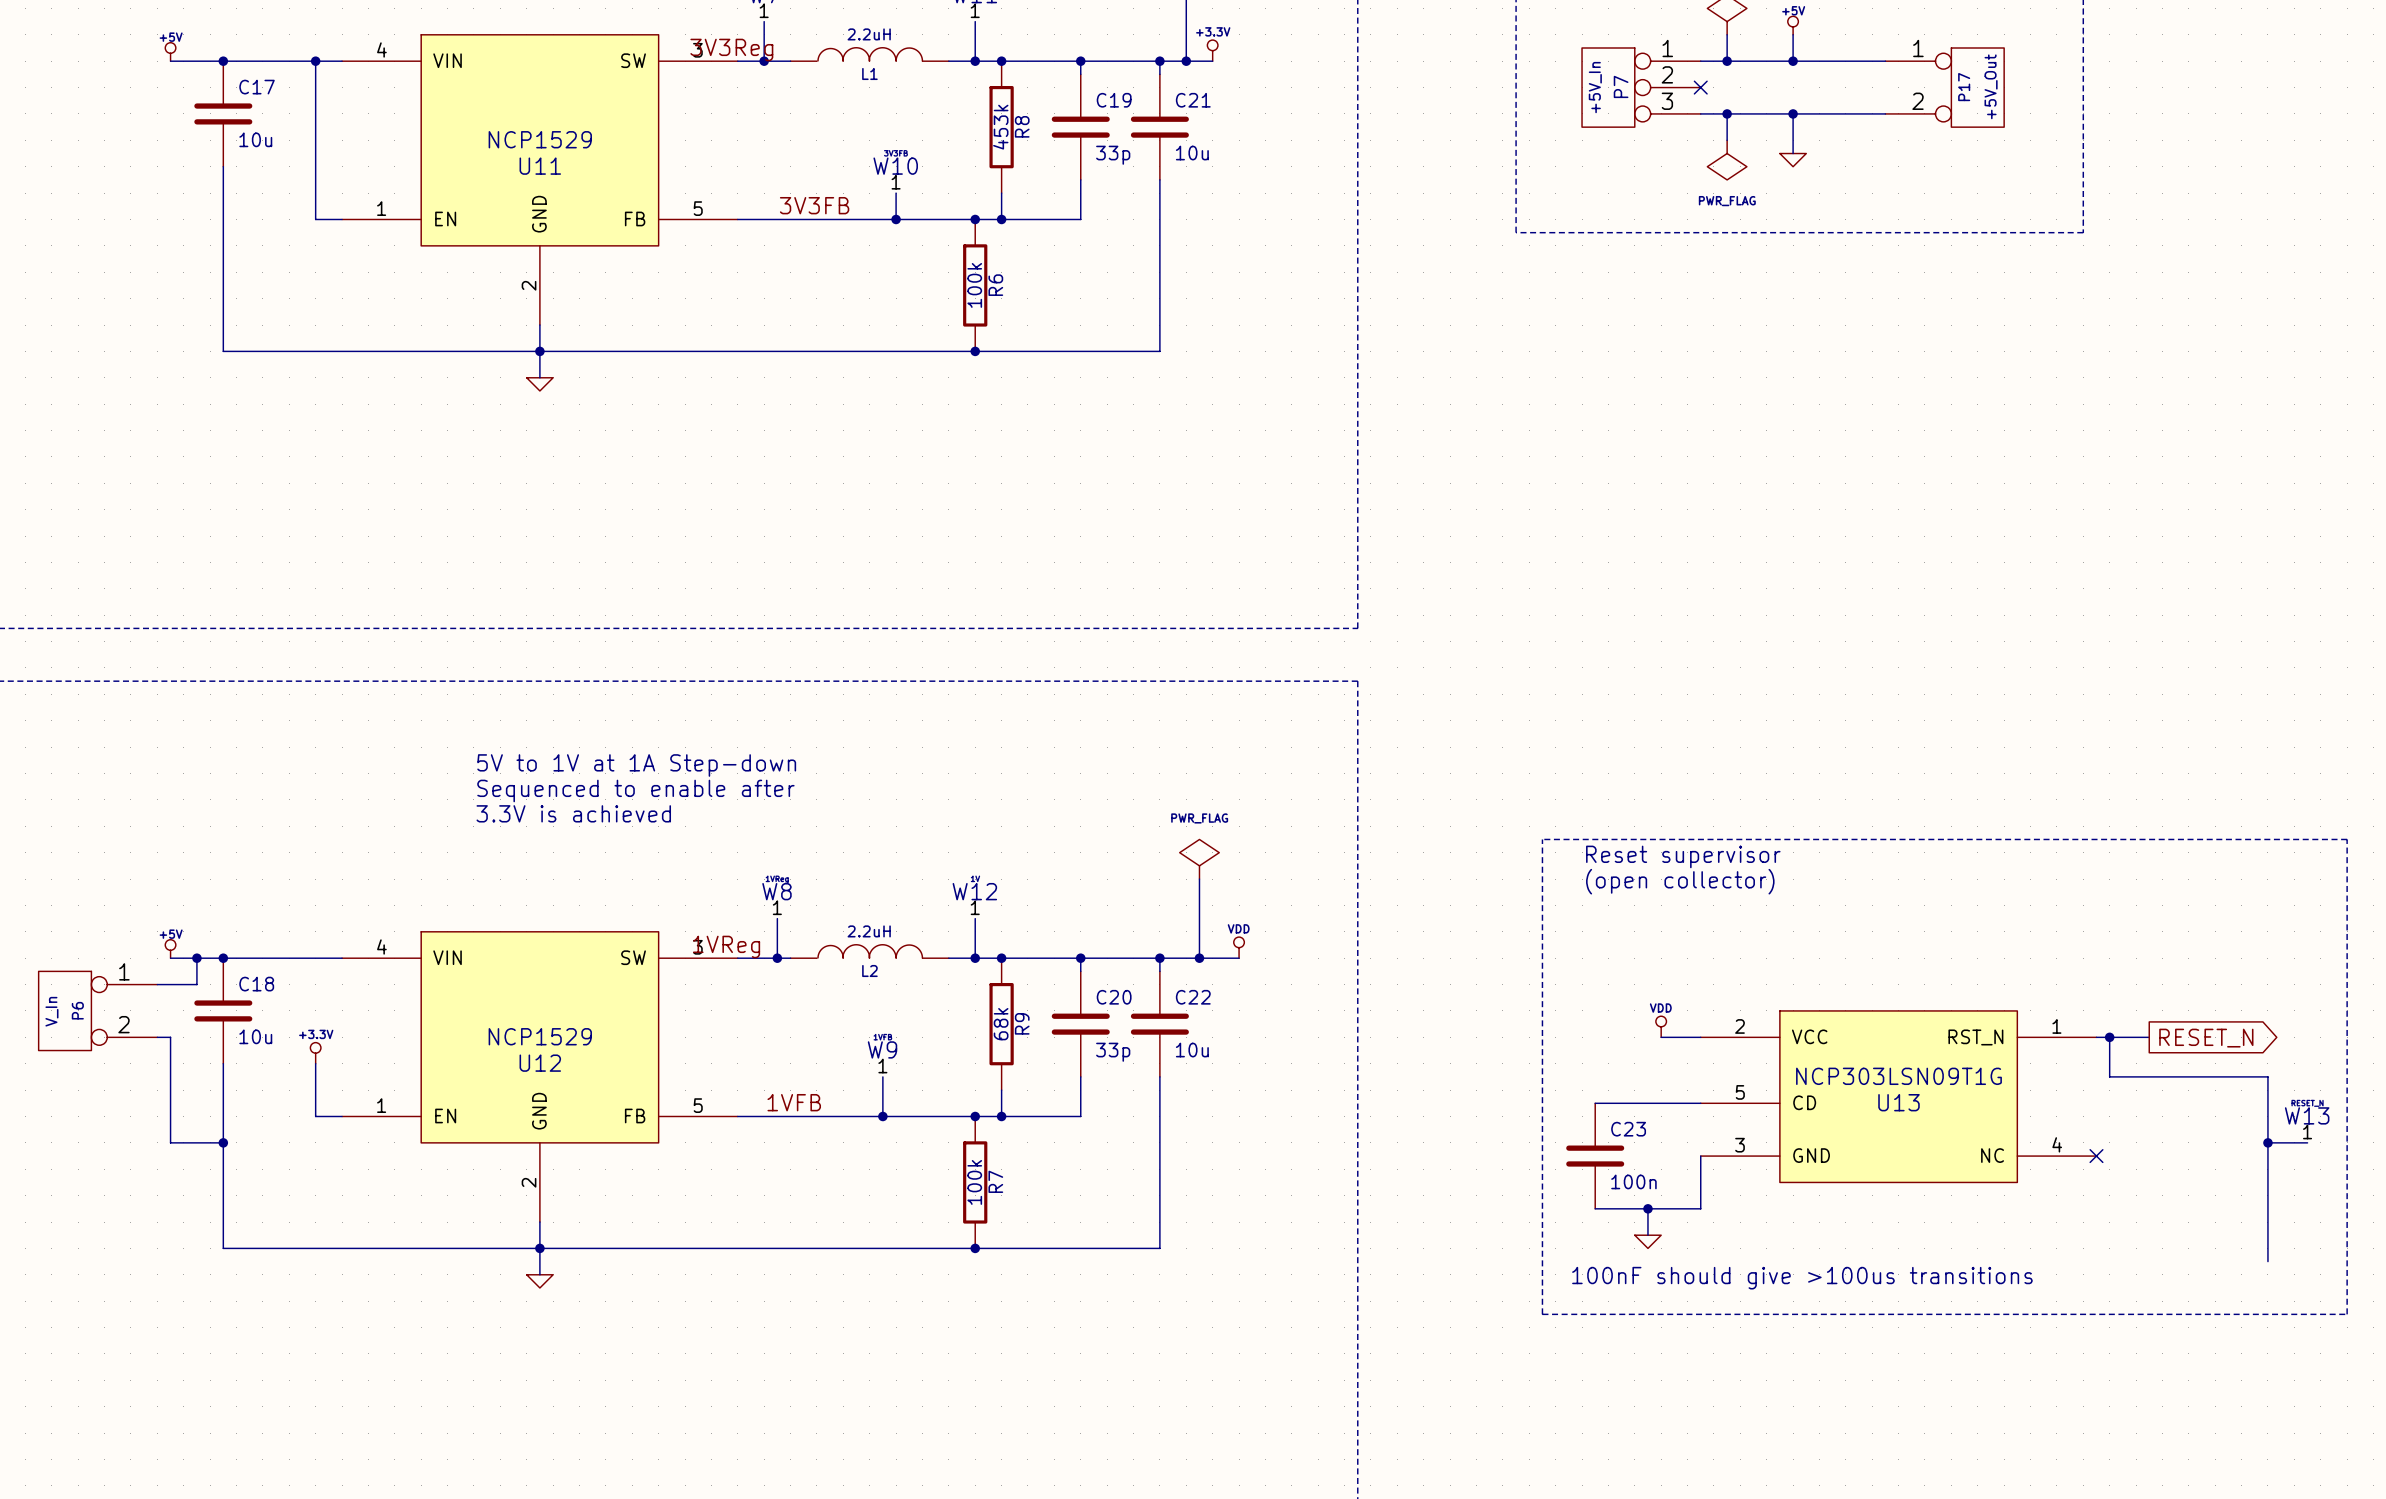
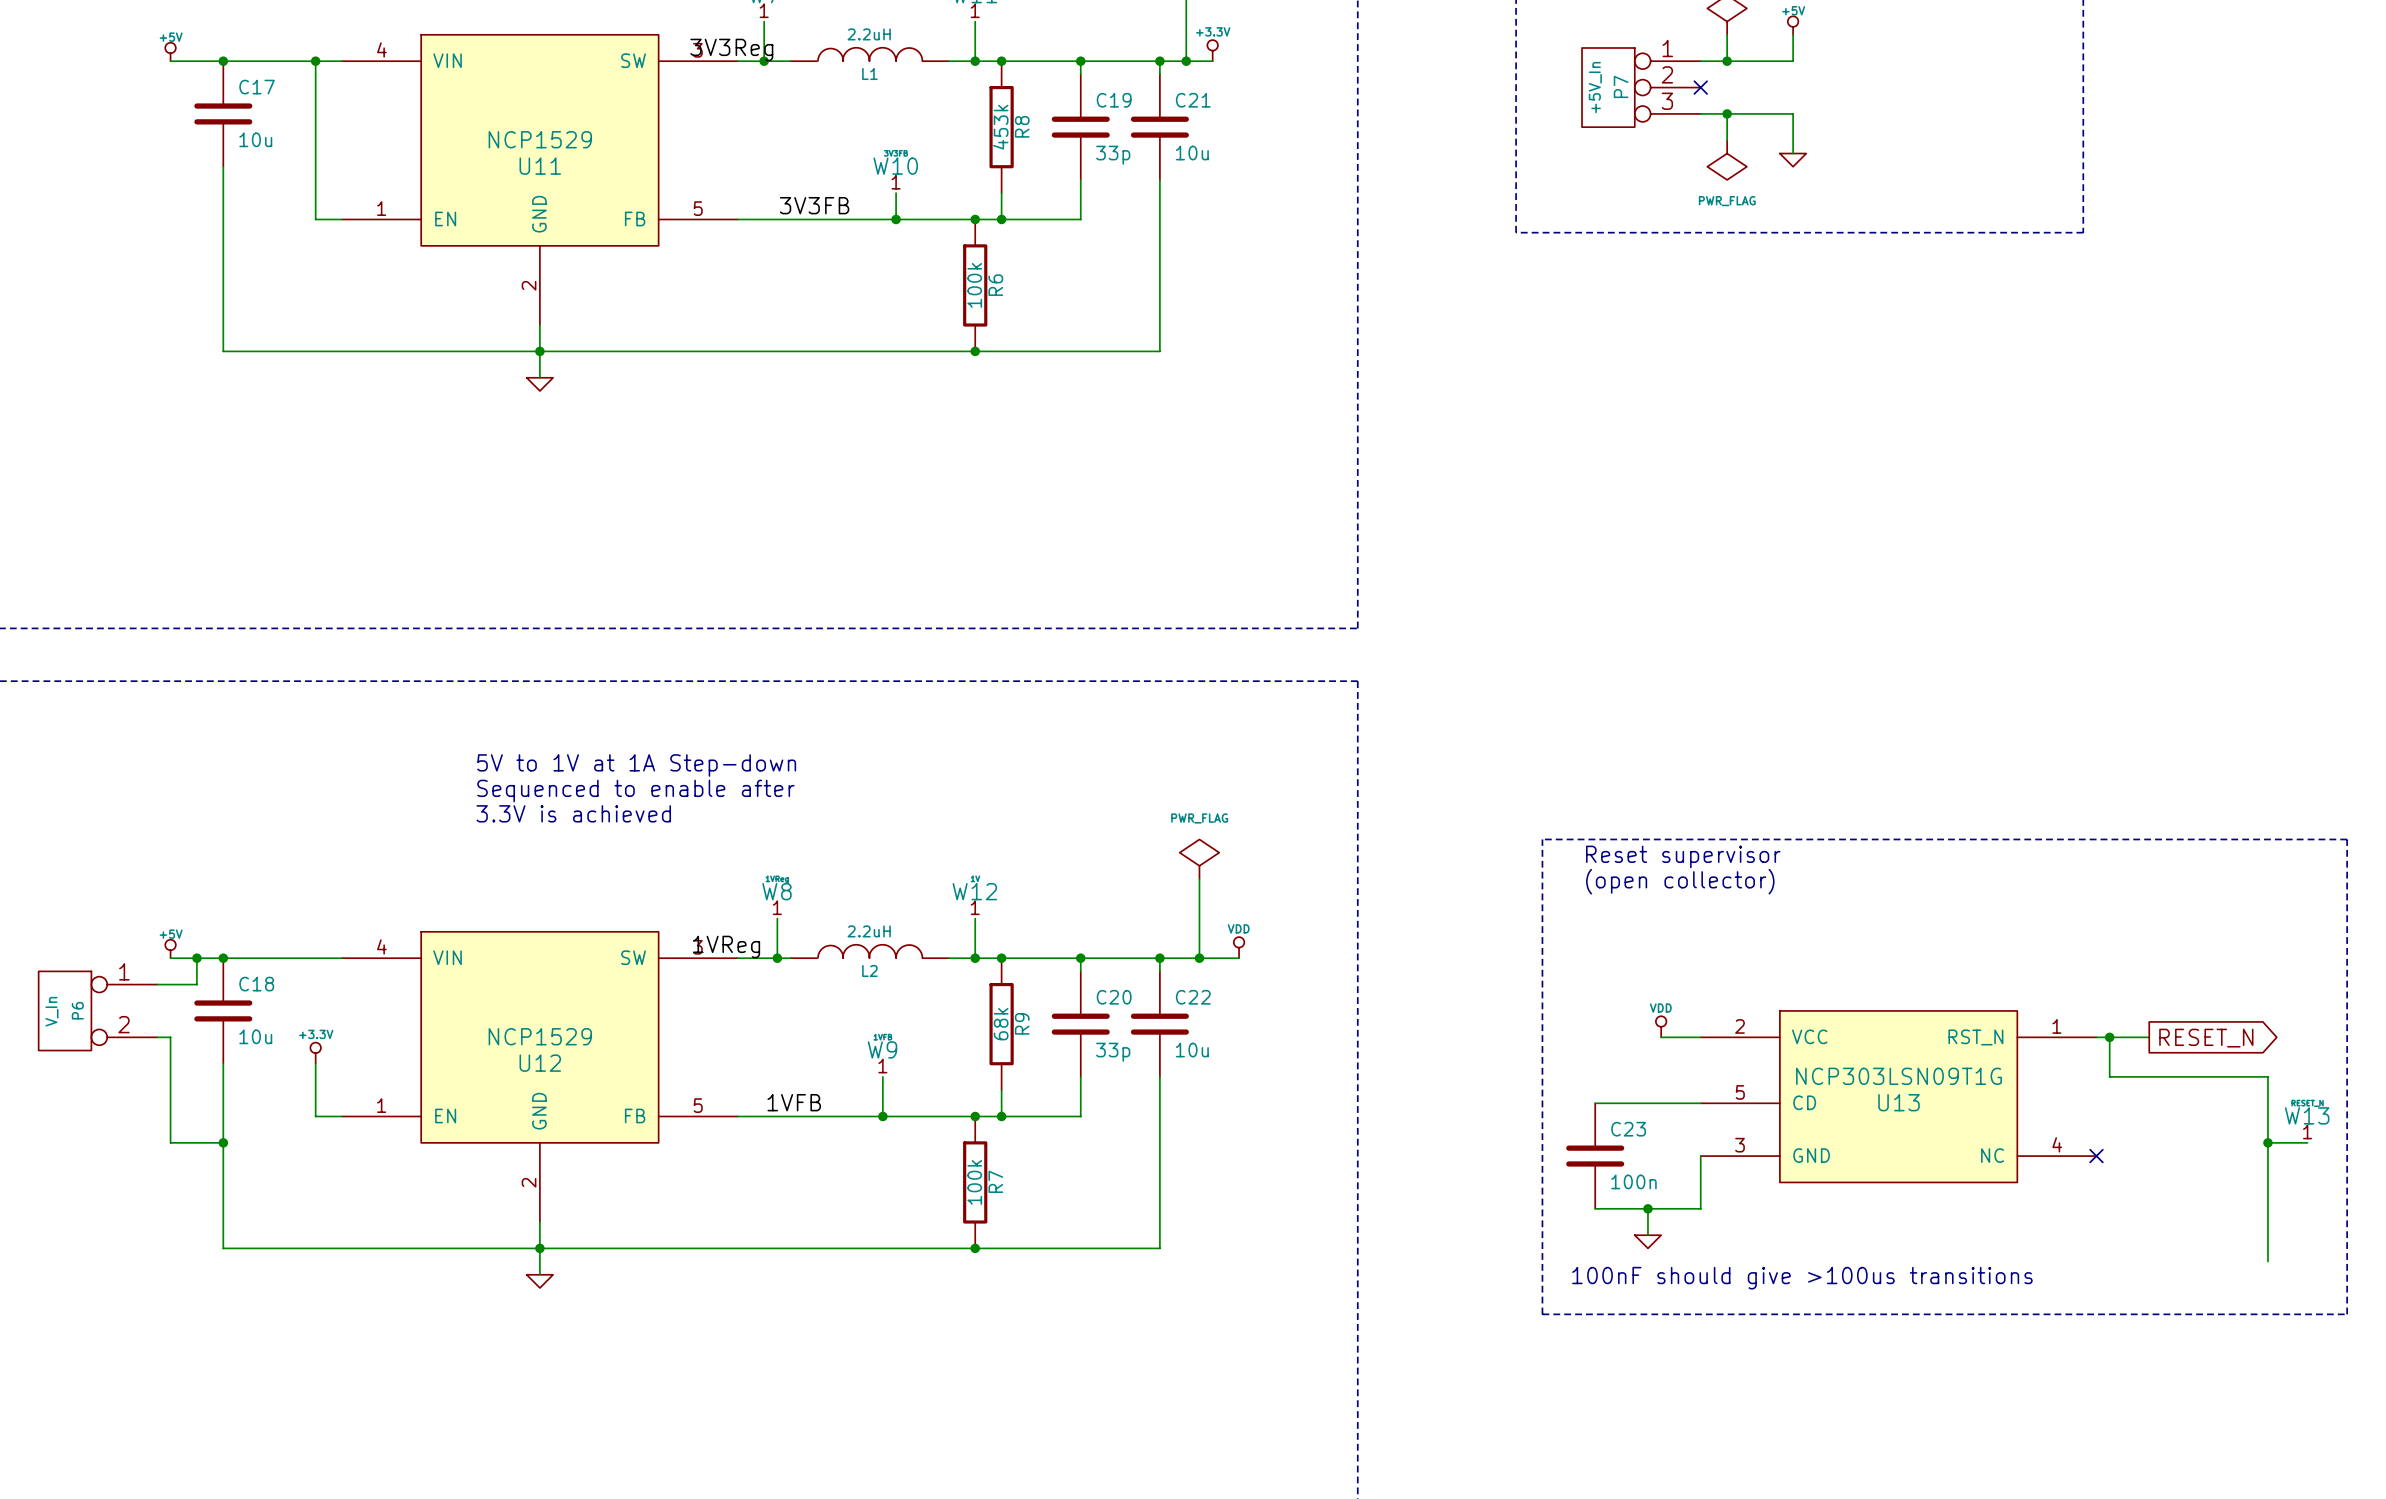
wire: (1793, 61) (1885, 61) -> none
junction: (1793, 61) -> none
P17: +5V_Out (1944, 87) -> none
wire: (1793, 113) (1885, 113) -> none
junction: (1793, 113) -> none

